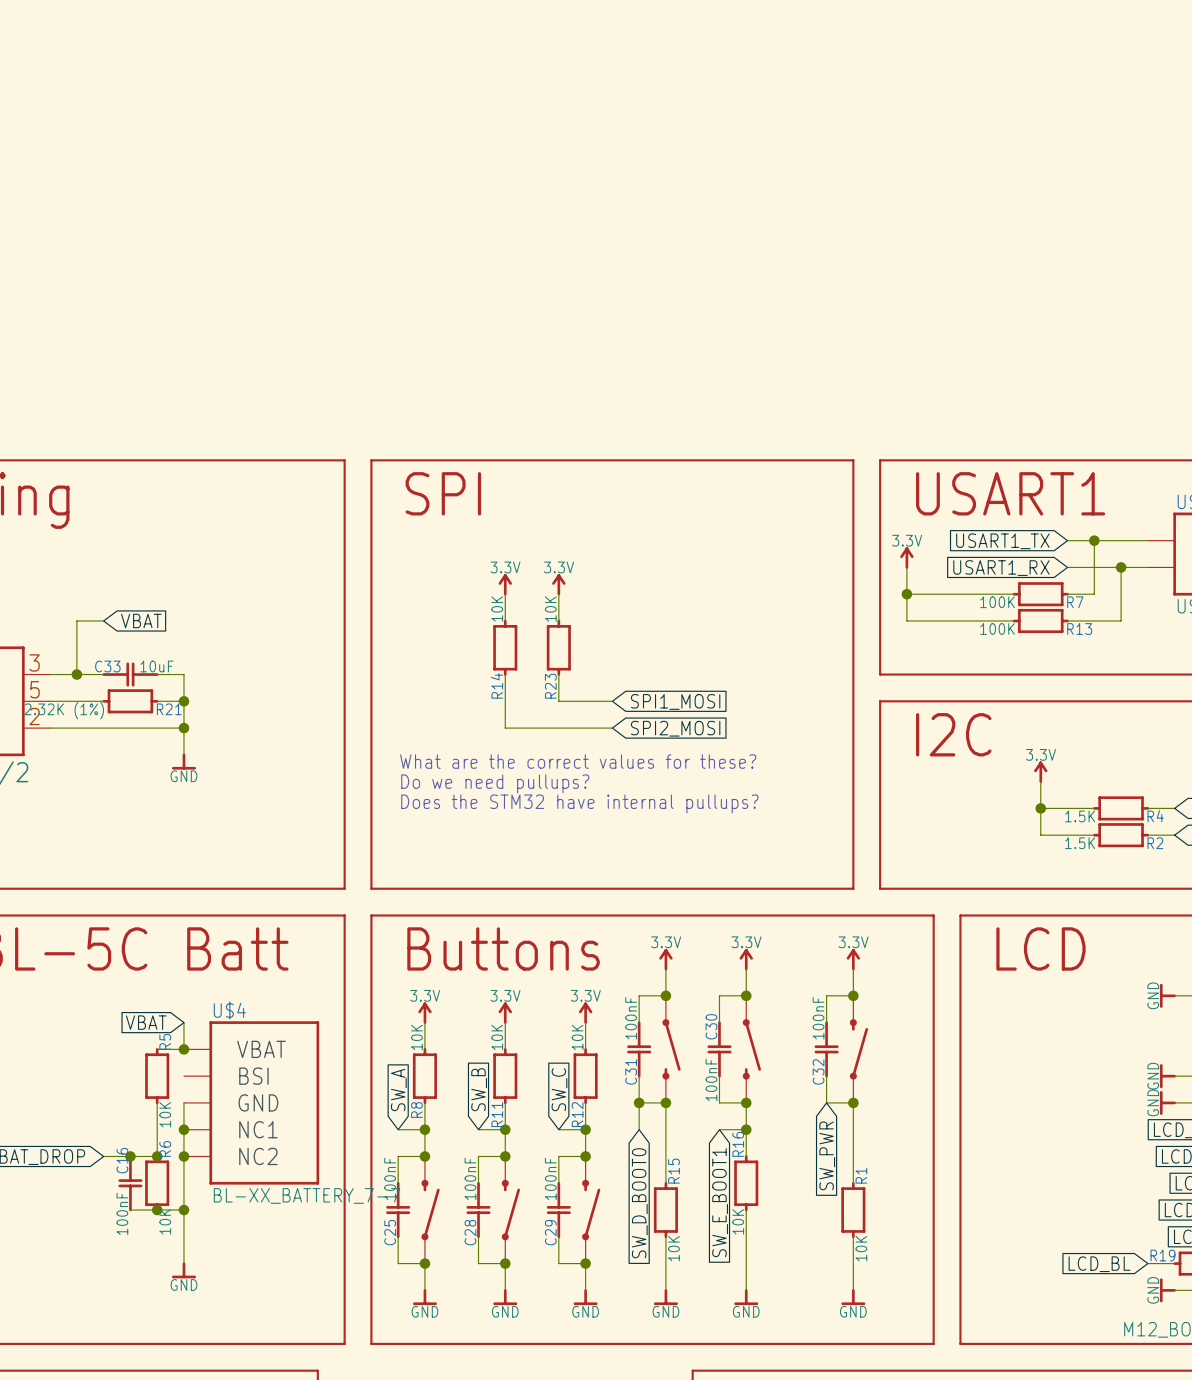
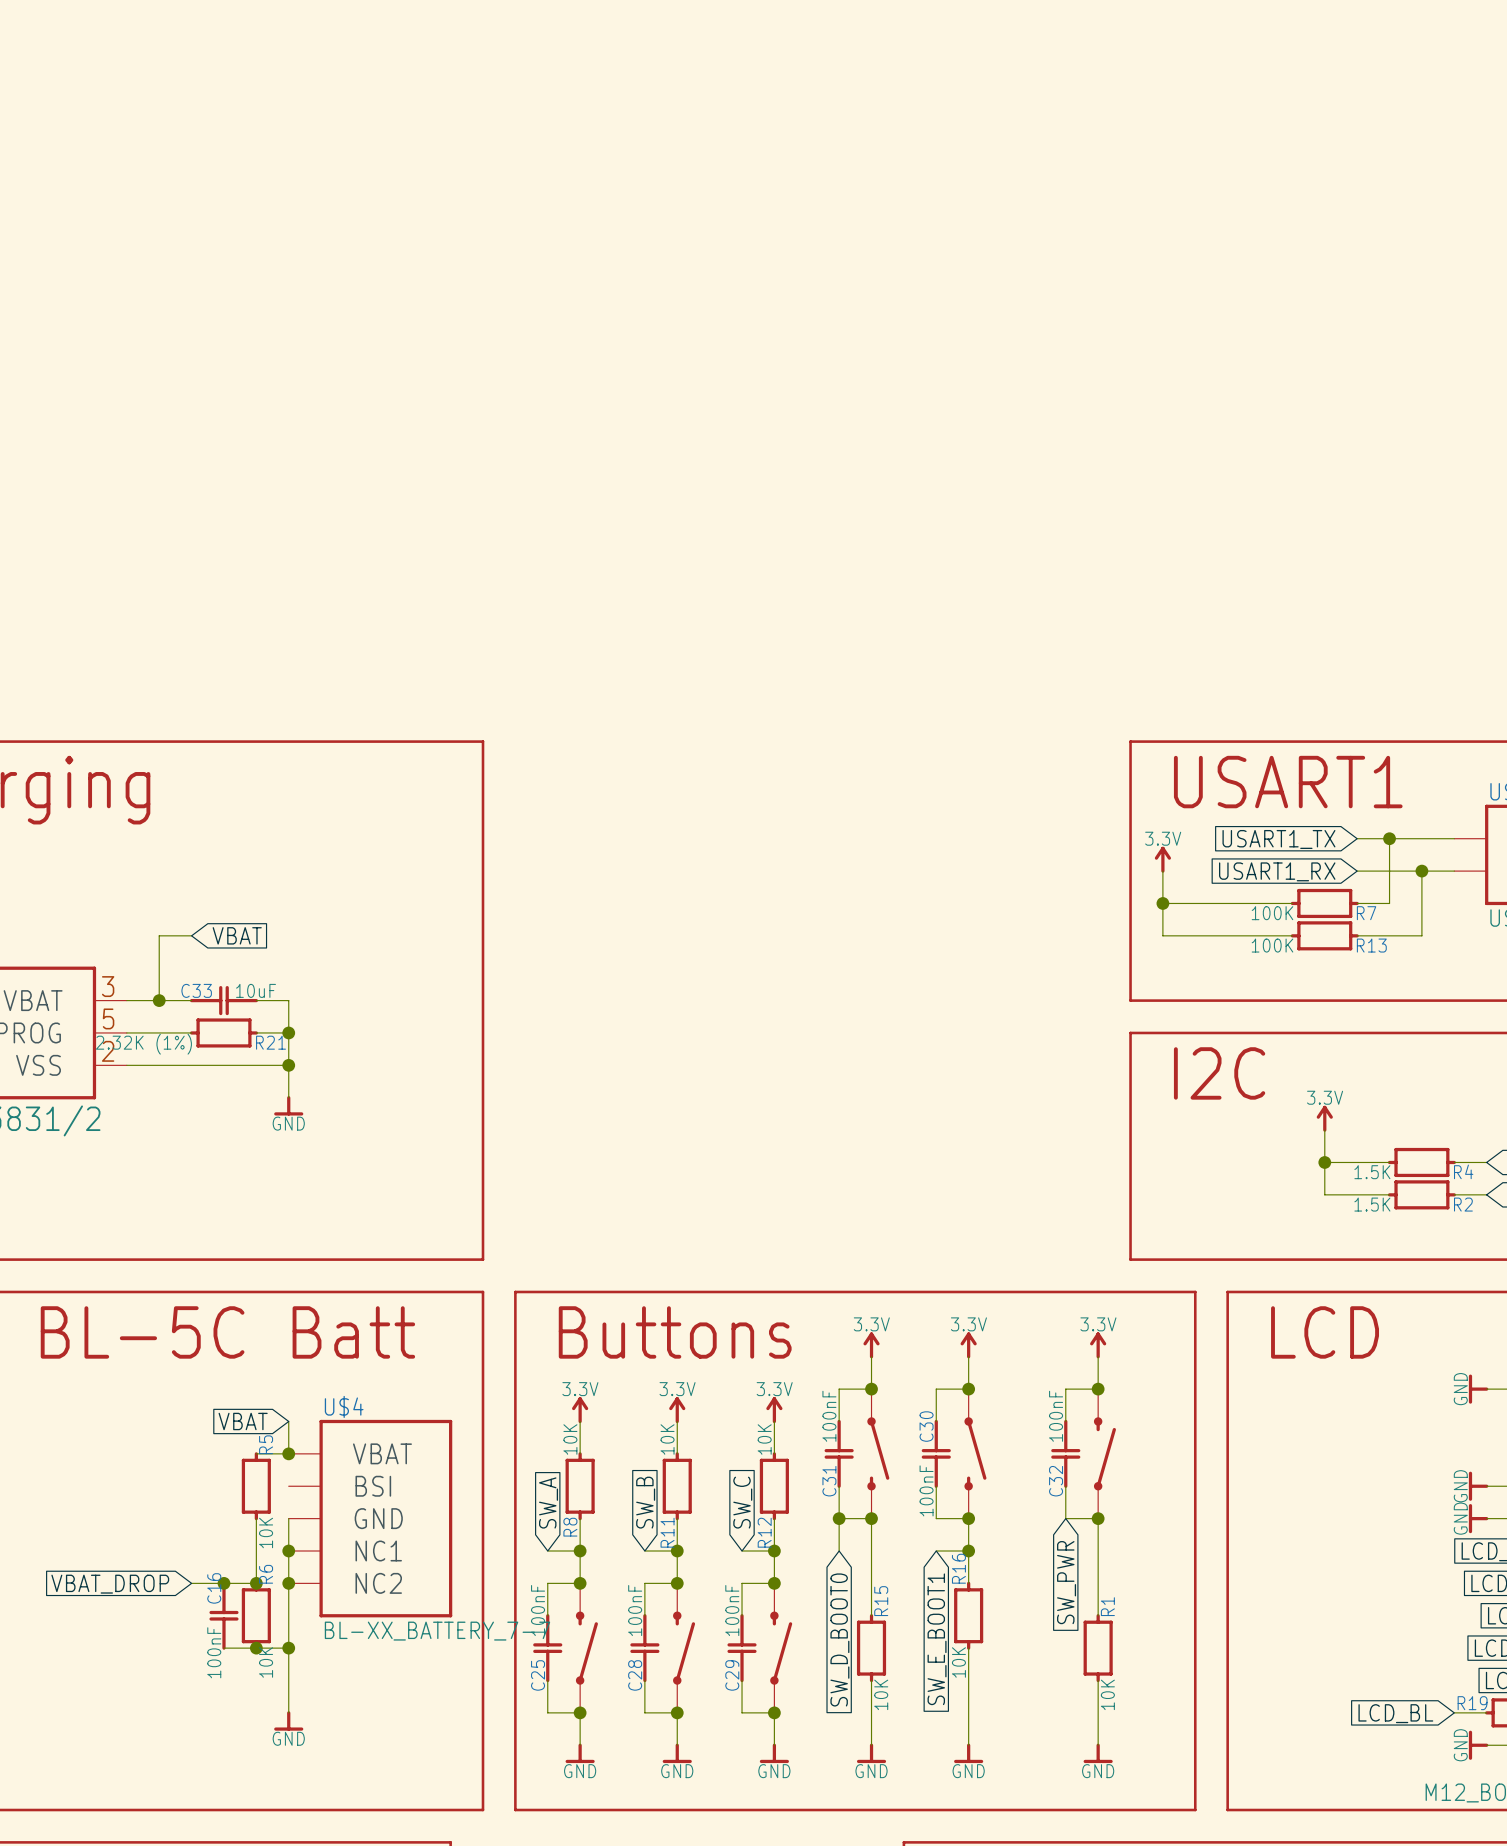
line: (371, 460) (371, 888) (853, 888) (853, 460) (371, 460) -> none
text: SPI (443, 493) -> none
power symbol: 3.3V (505, 584) -> none
power symbol: 3.3V (558, 584) -> none
wire: (505, 594) (505, 620) -> none
wire: (558, 594) (558, 620) -> none
R14: 10K (505, 647) -> none
R23: 10K (558, 647) -> none
wire: (505, 674) (505, 728) (612, 728) -> none
wire: (558, 674) (558, 701) (612, 701) -> none
global label: SPI1_MOSI (675, 701) -> none
global label: SPI2_MOSI (675, 728) -> none
text: What are the correct values for these? (578, 761) -> none
text: Do we need pullups? (495, 783) -> none
text: Does the STM32 have internal pullups? (579, 803) -> none

